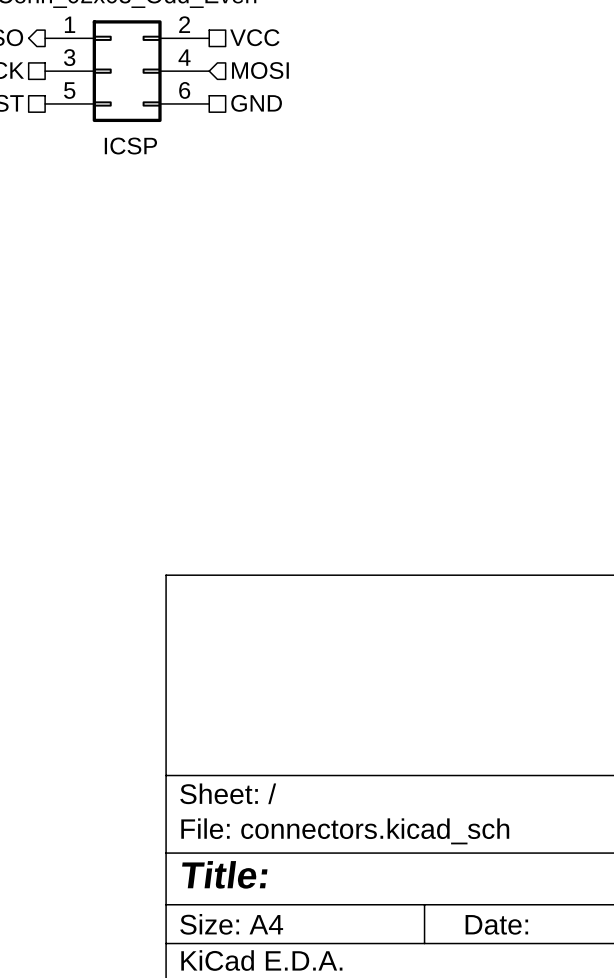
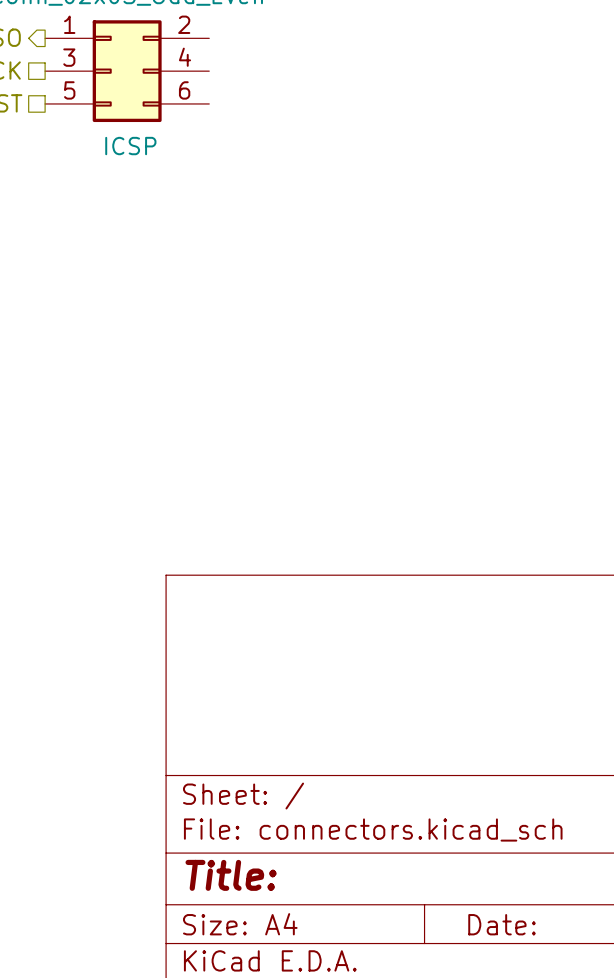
hierarchical label: VCC (254, 37) -> none
hierarchical label: MOSI (260, 70) -> none
hierarchical label: GND (256, 103) -> none

